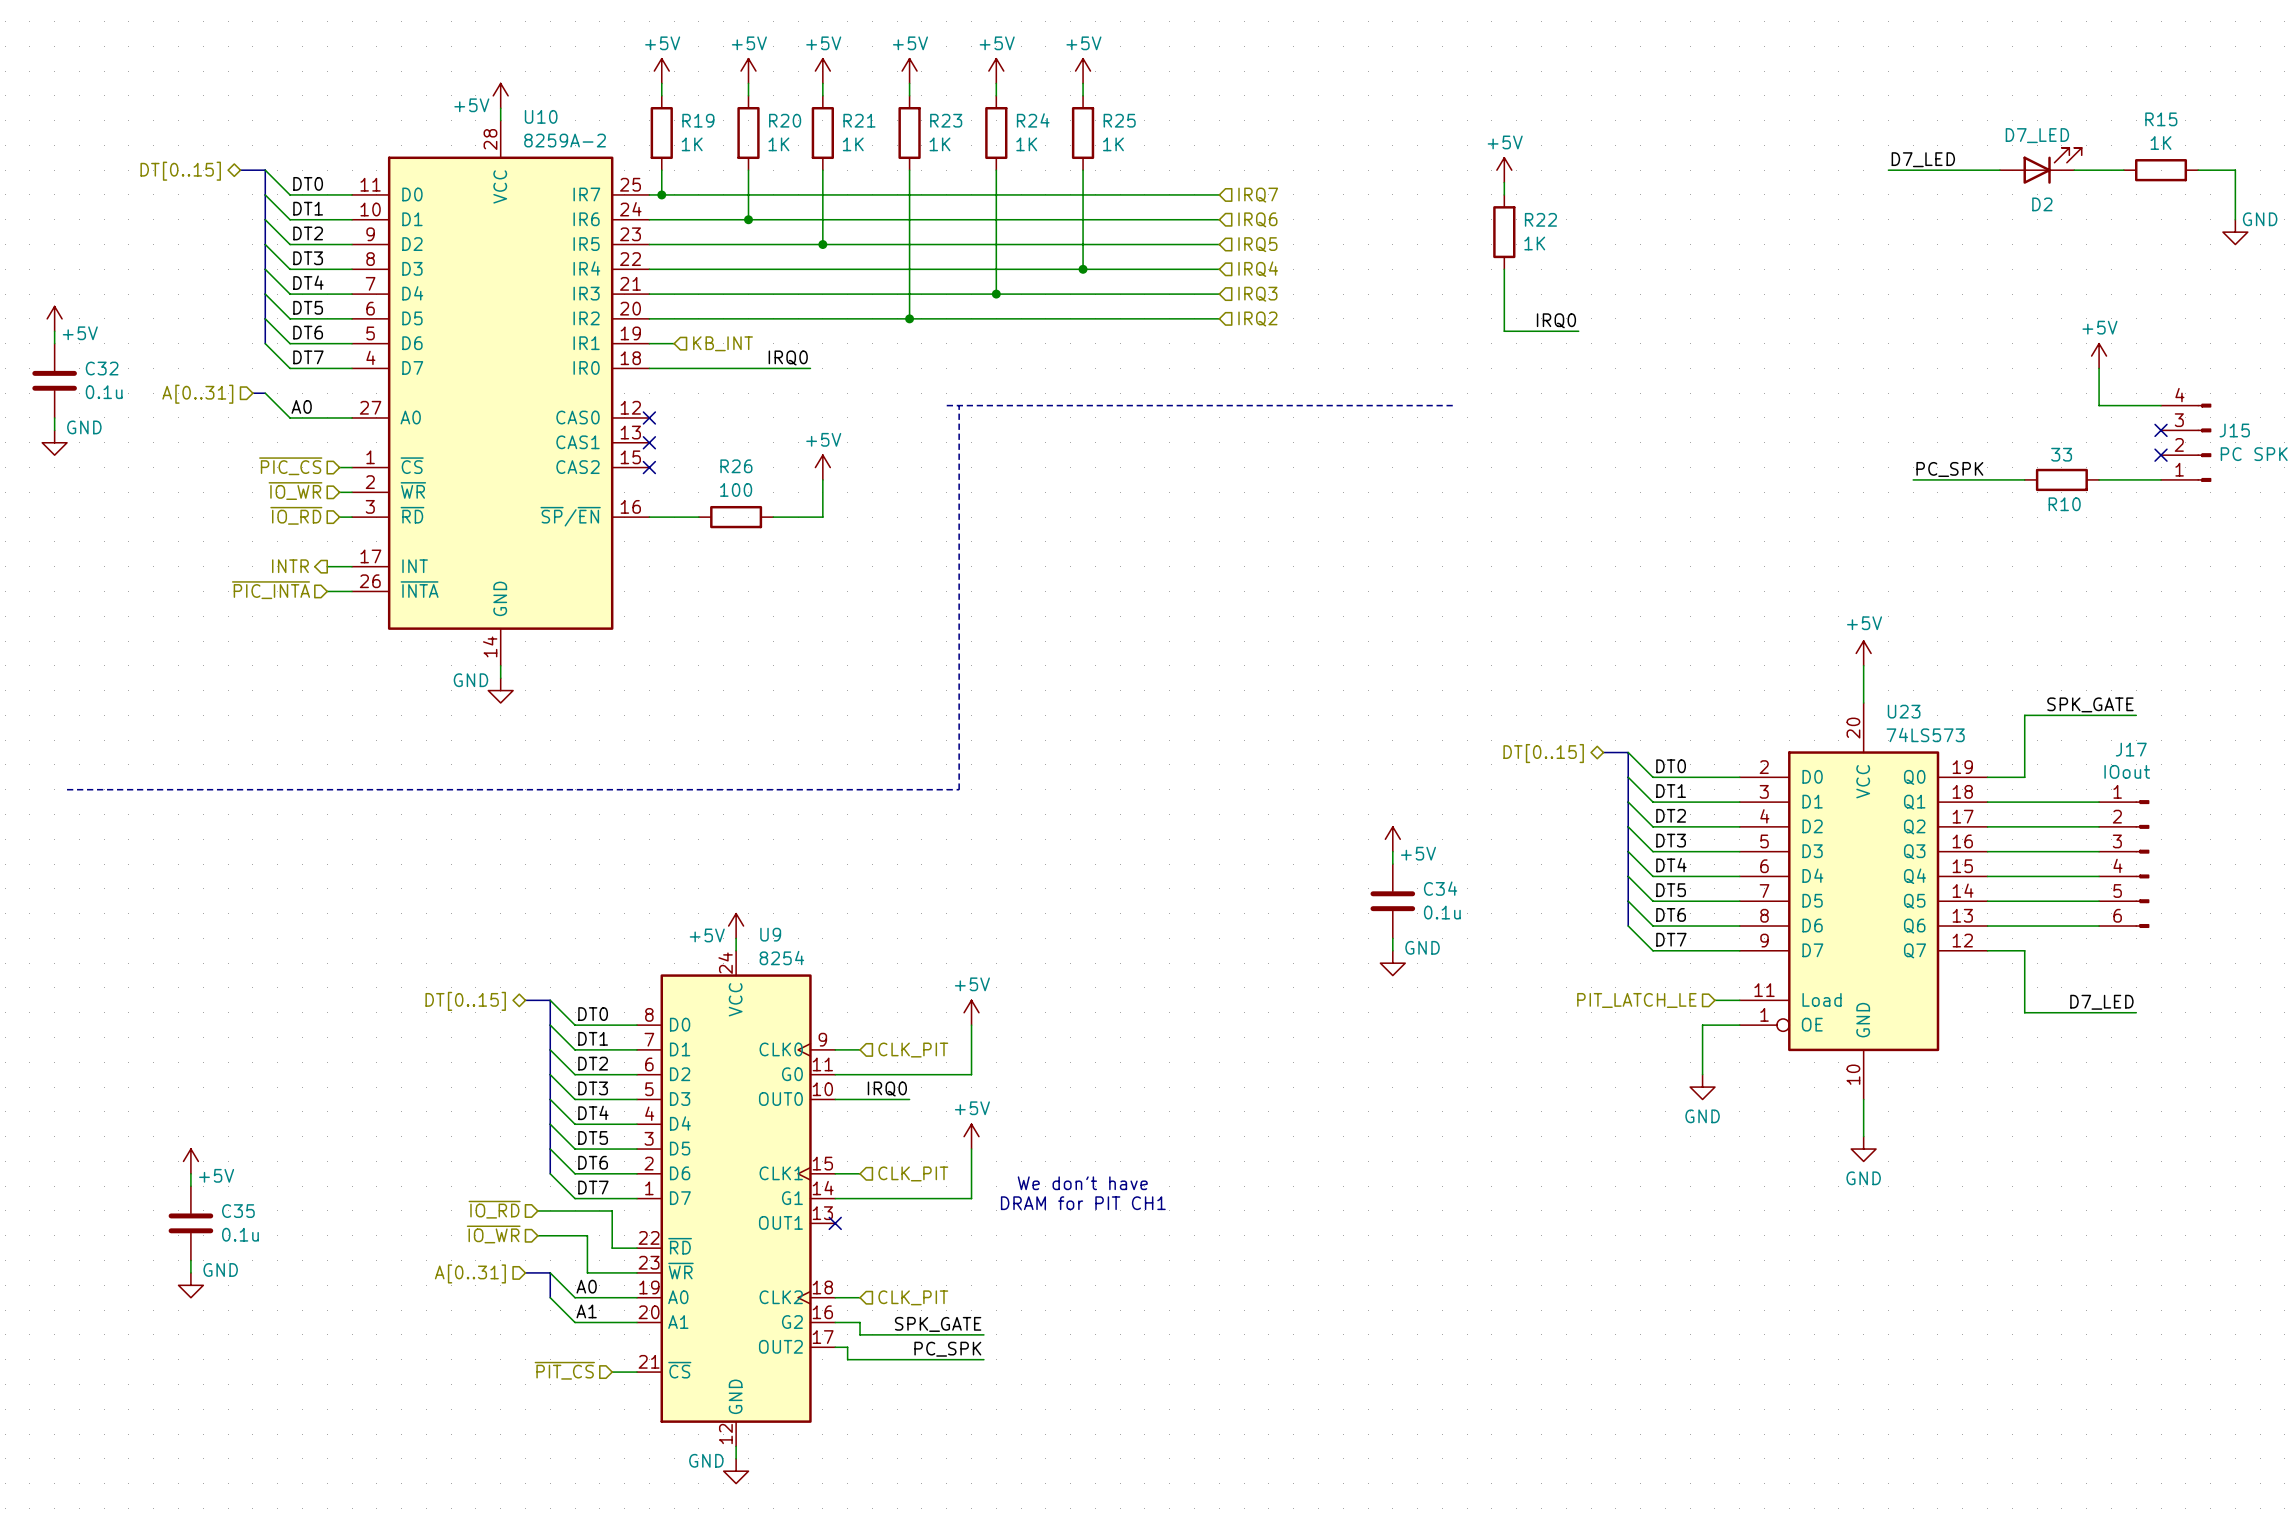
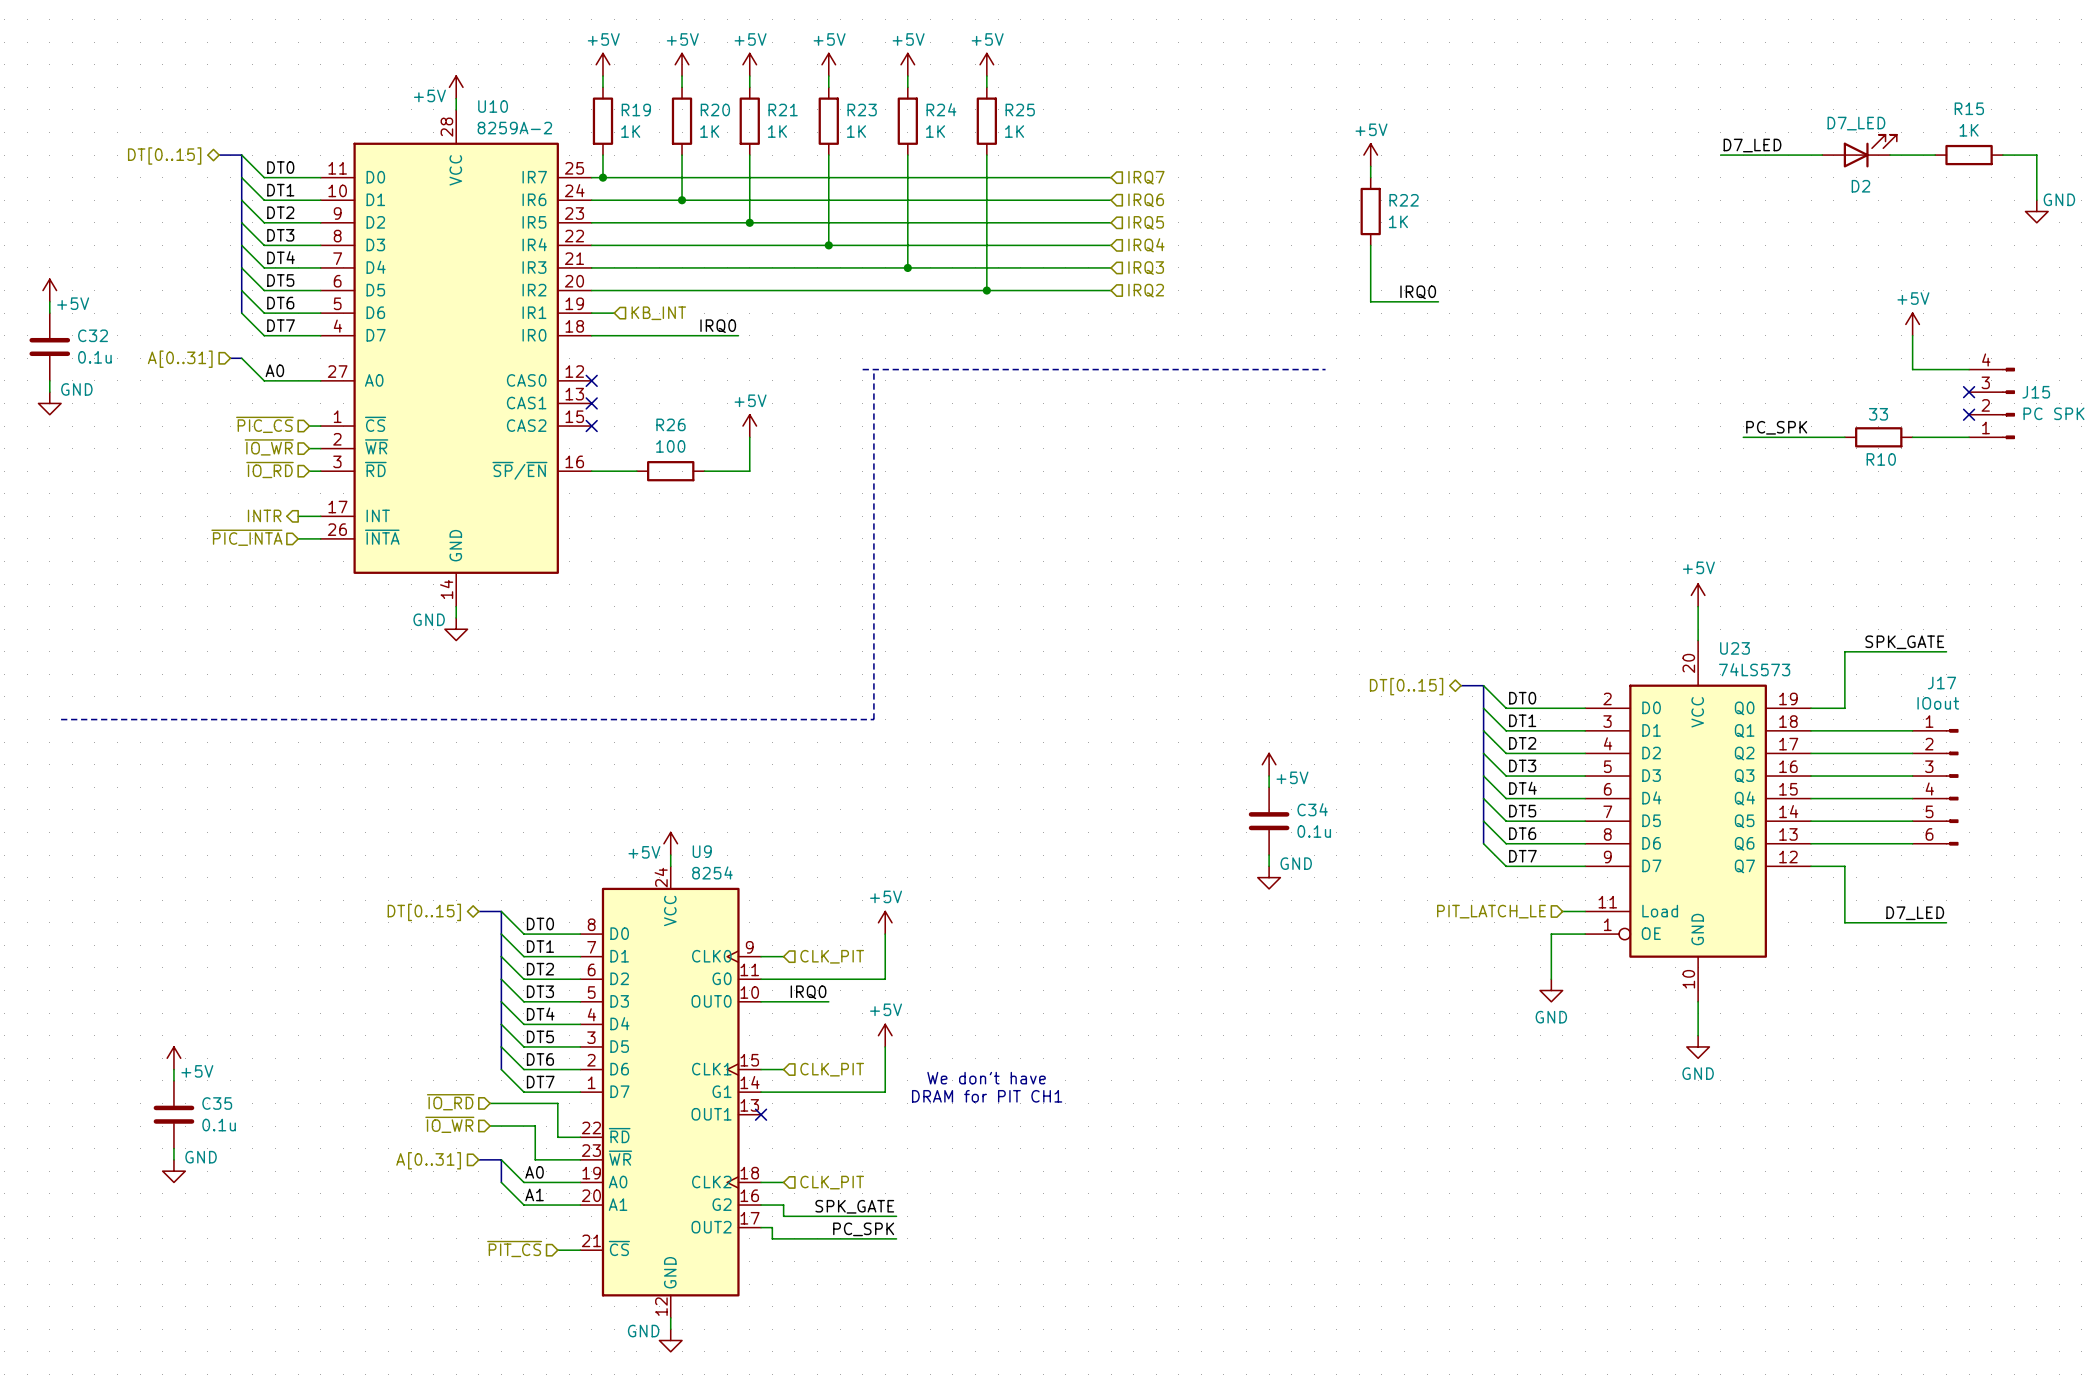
wire: (909, 269) (909, 318) -> (986, 245) (986, 290)
junction position: (1083, 269) -> (986, 290)
junction position: (909, 318) -> (828, 245)

